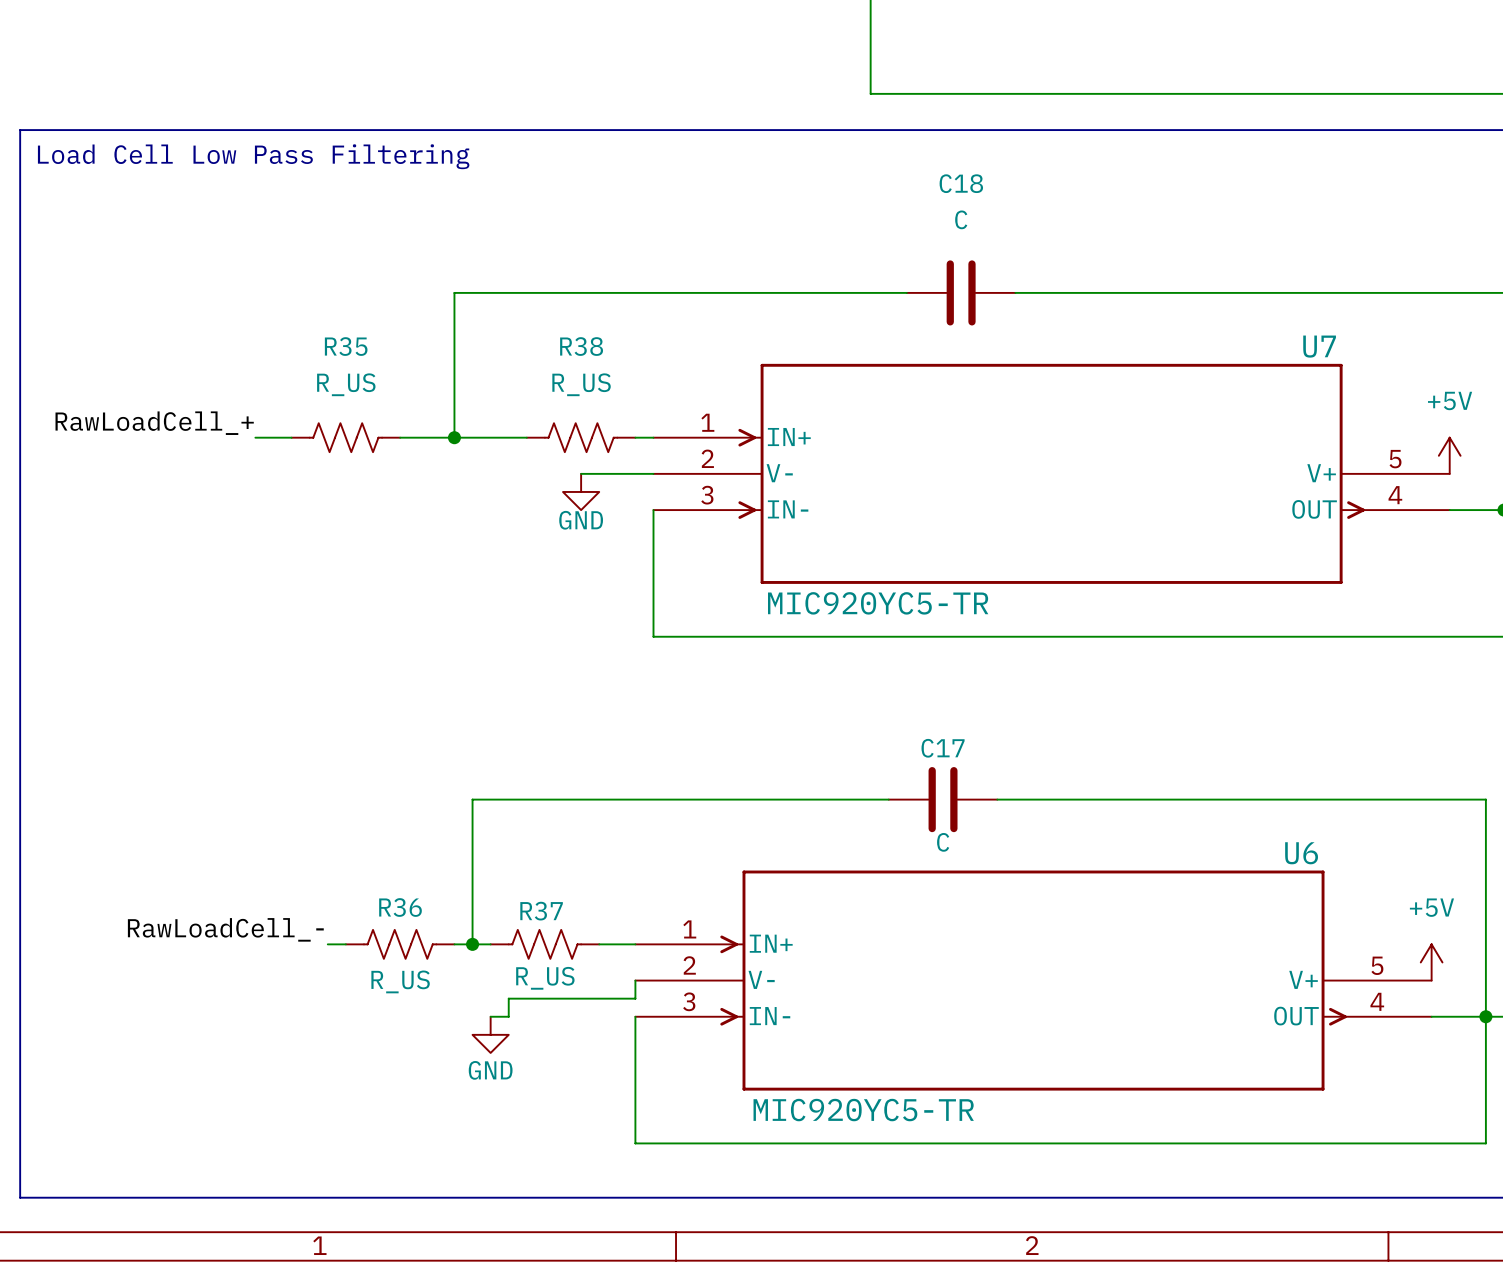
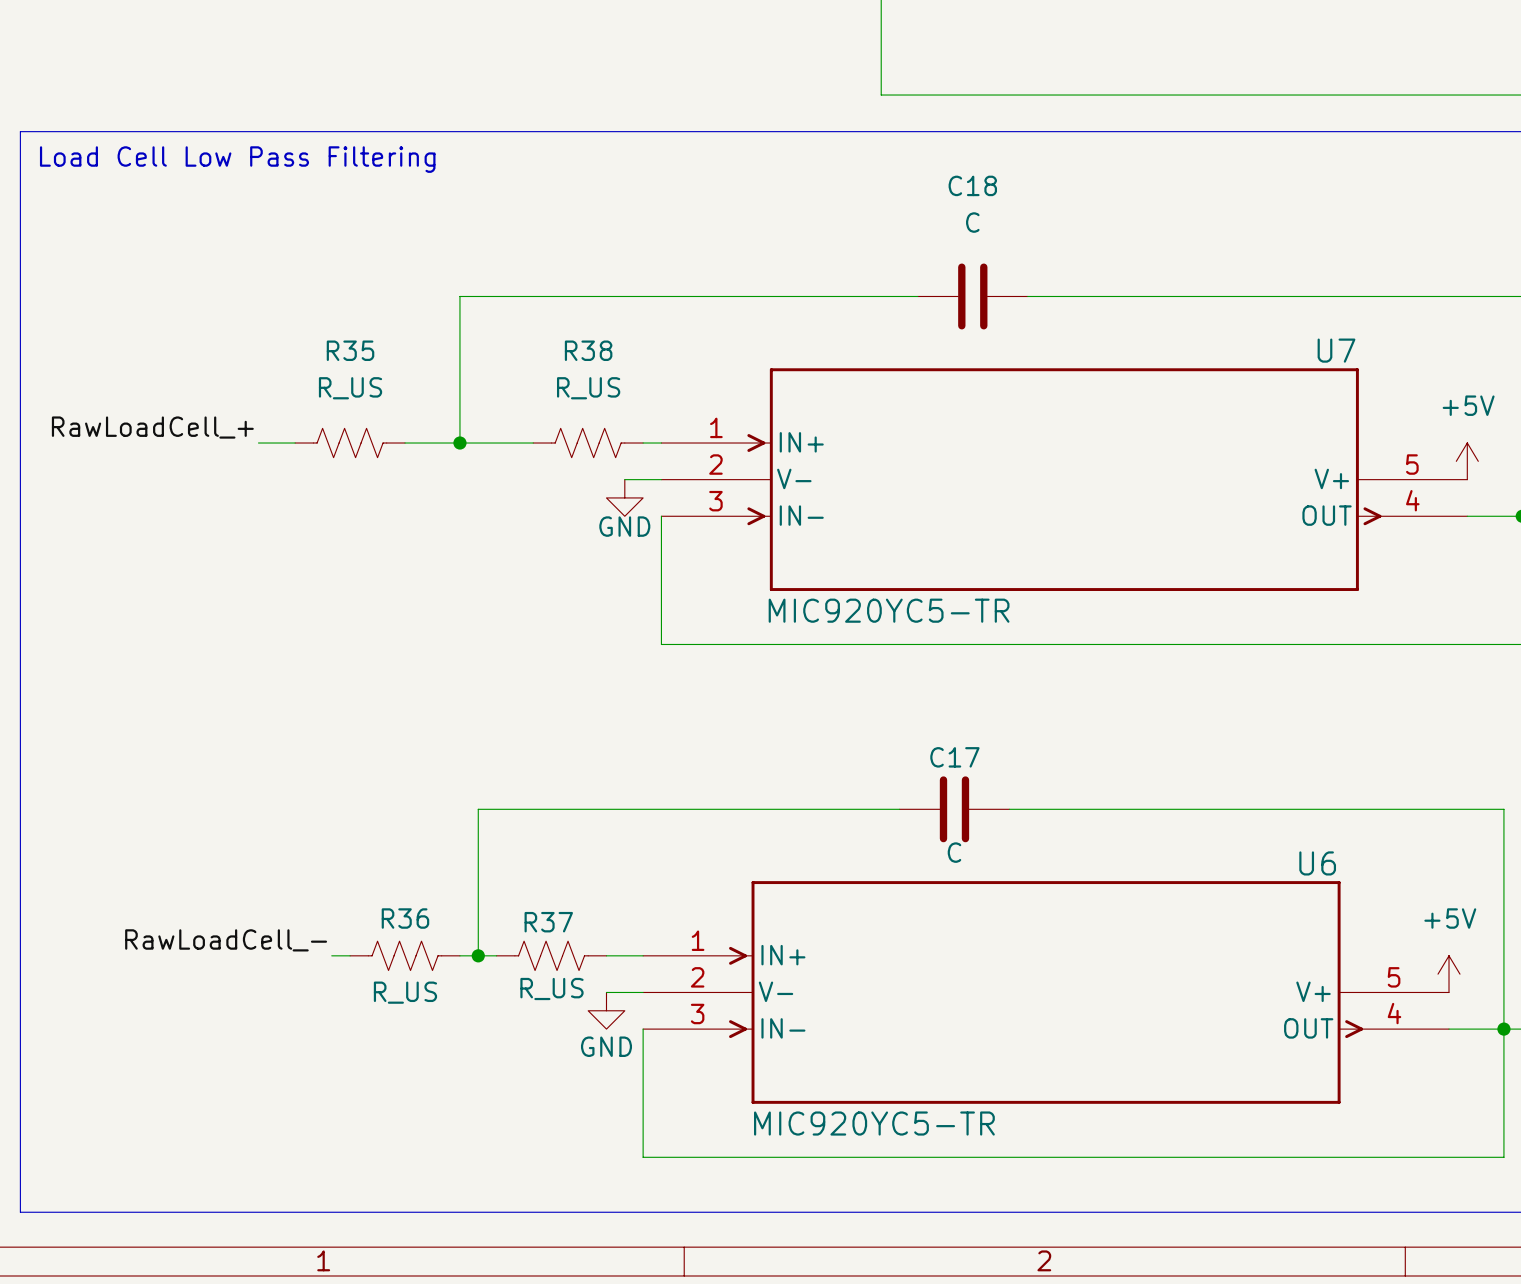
wire: (581, 473) (617, 473) -> none
power symbol position: GND (581, 491) -> GND (624, 497)
wire: (635, 980) (635, 998) (508, 998) (508, 1016) (490, 1016) -> (643, 992) (606, 992)
power symbol position: GND (490, 1034) -> GND (606, 1010)

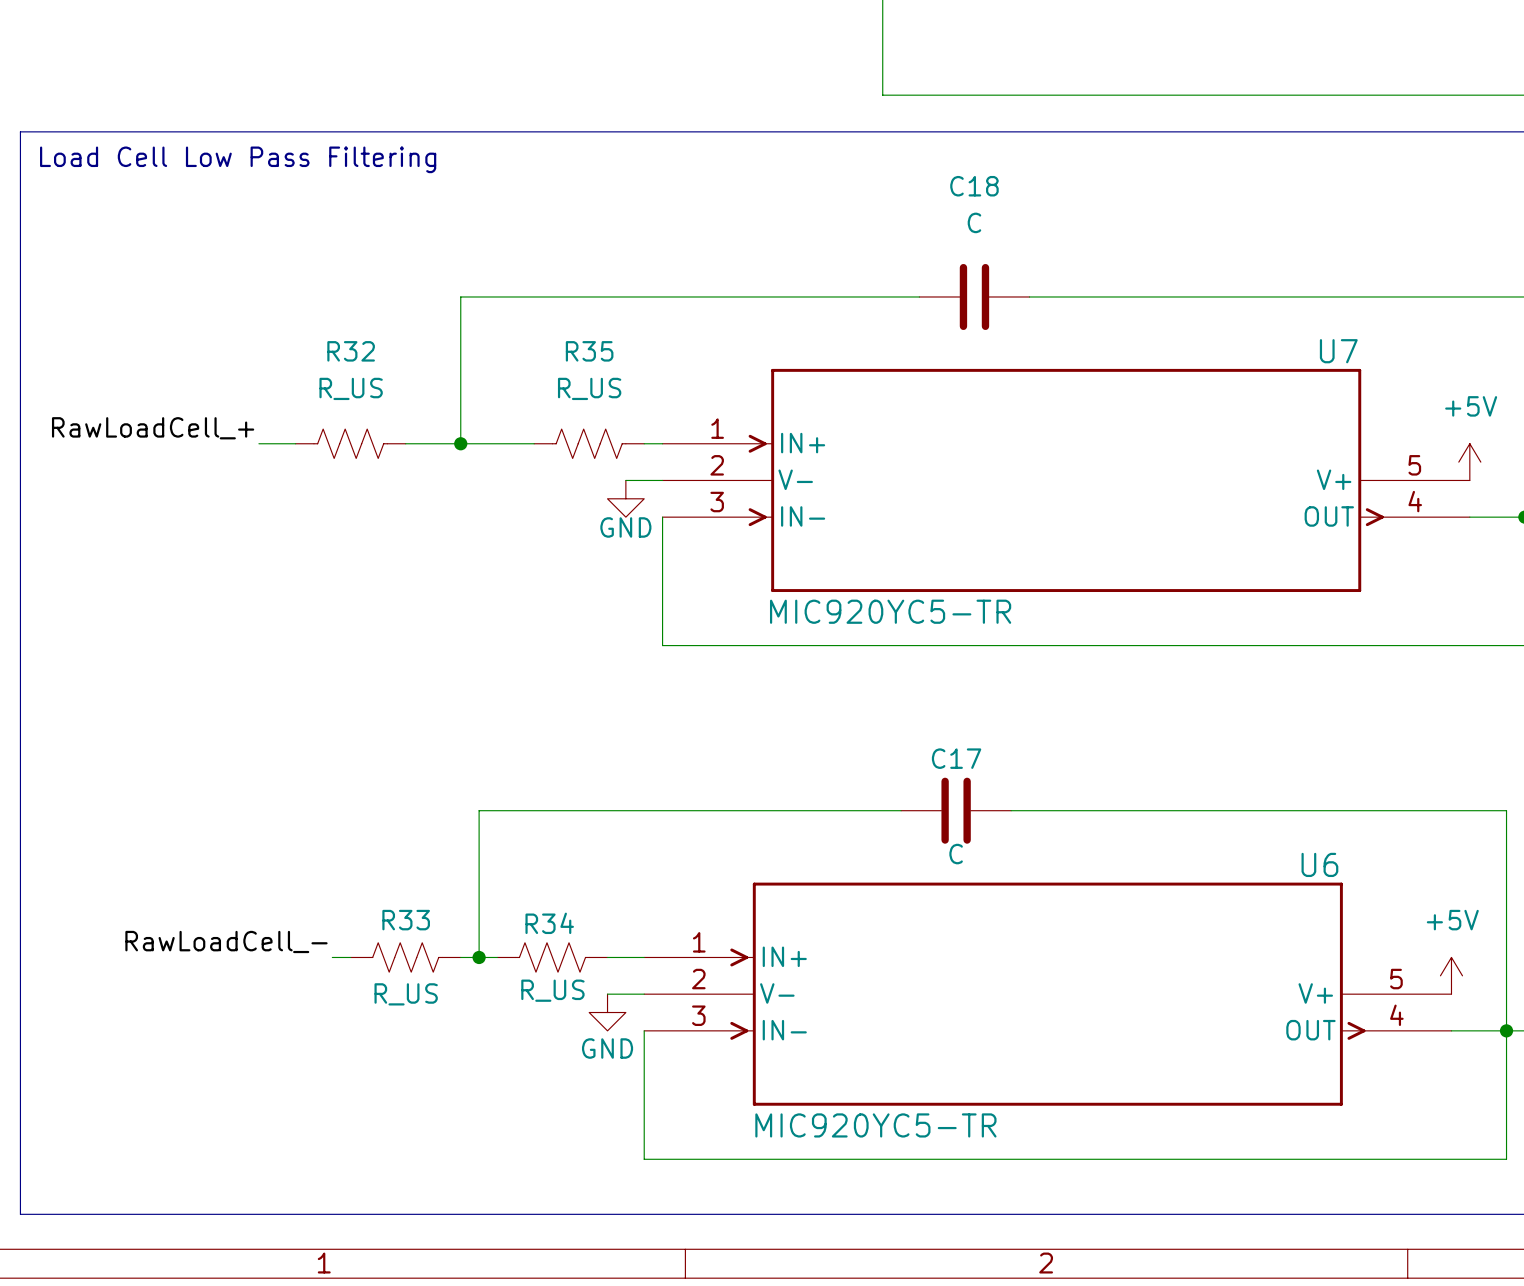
R35 name: R35 (350, 350) -> R32 (351, 351)
R38 name: R38 (588, 350) -> R35 (589, 351)
R36 name: R36 (405, 918) -> R33 (406, 920)
R37 name: R37 (548, 922) -> R34 (549, 923)

